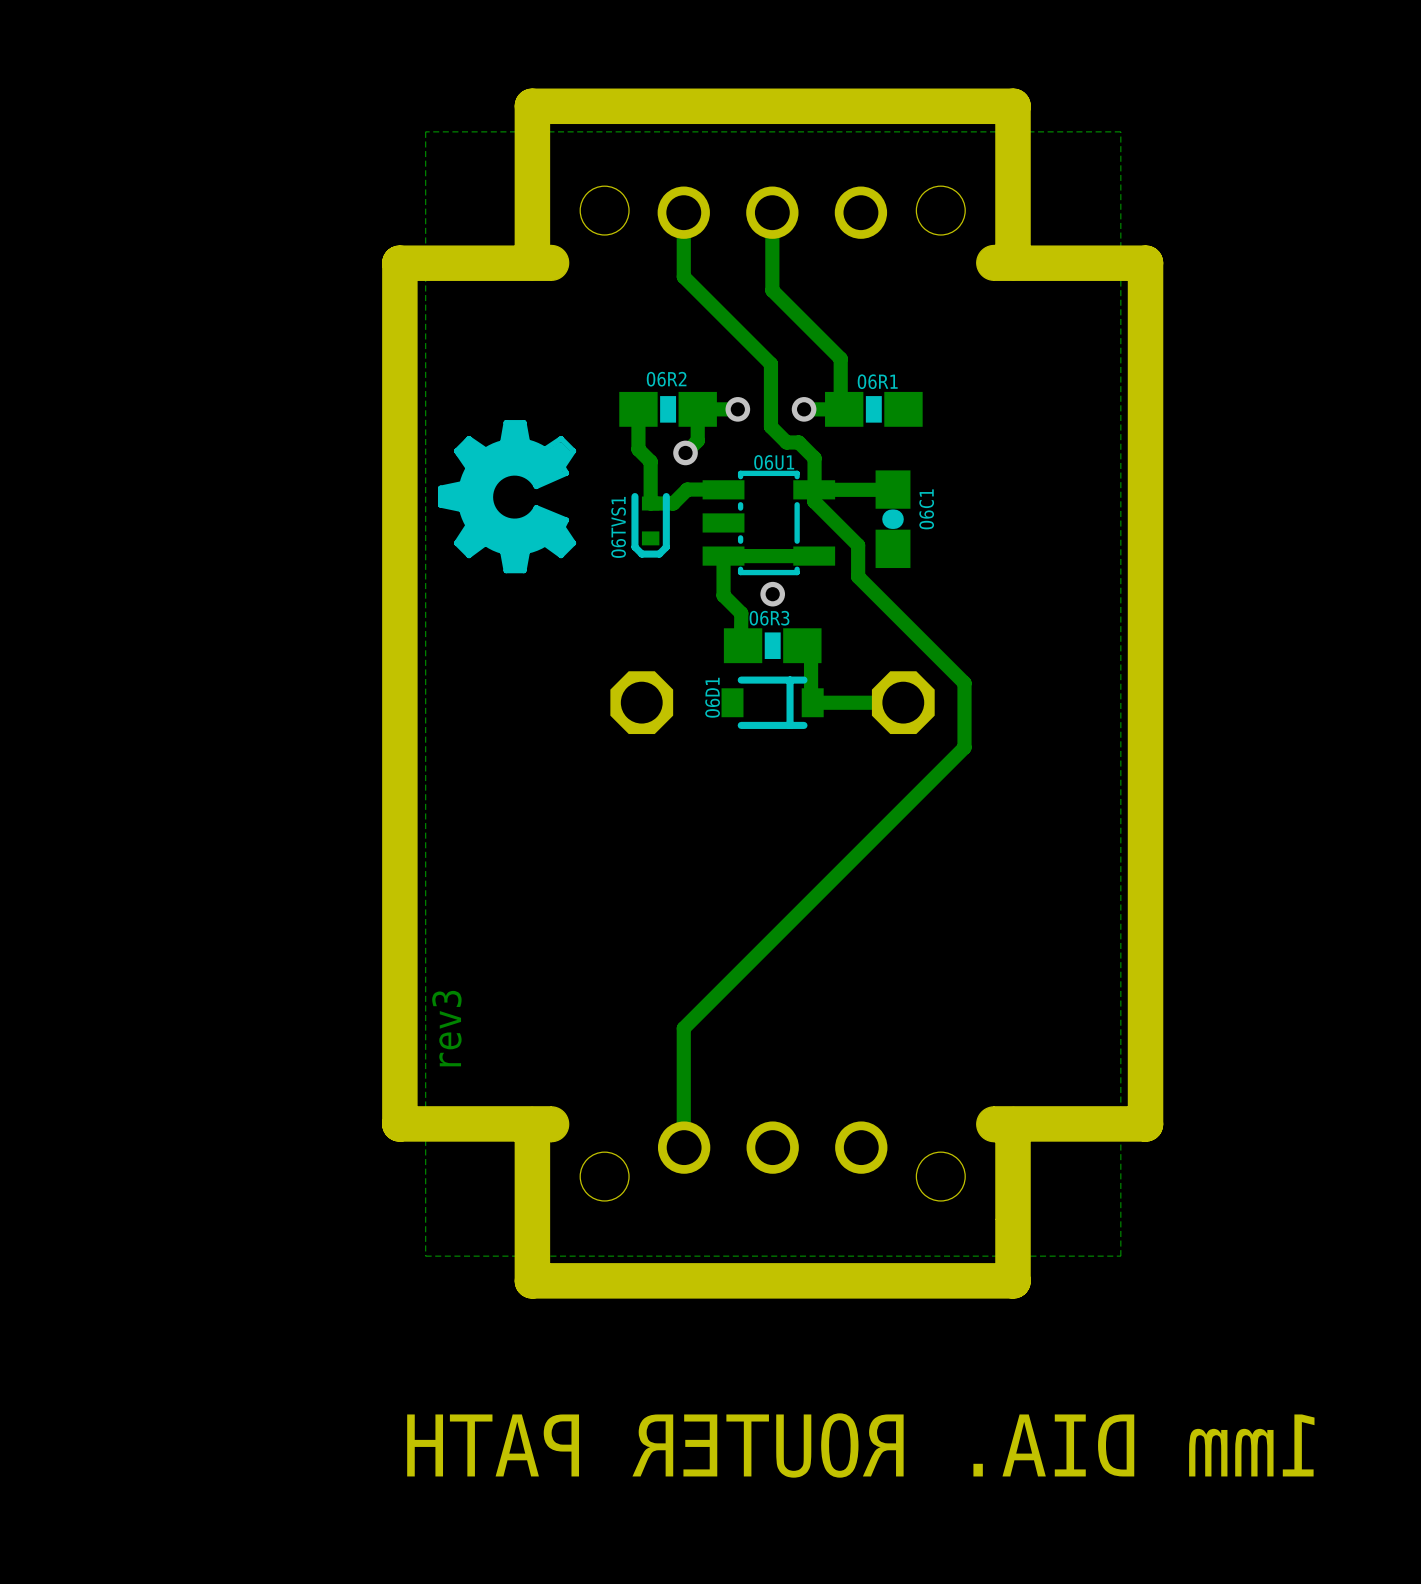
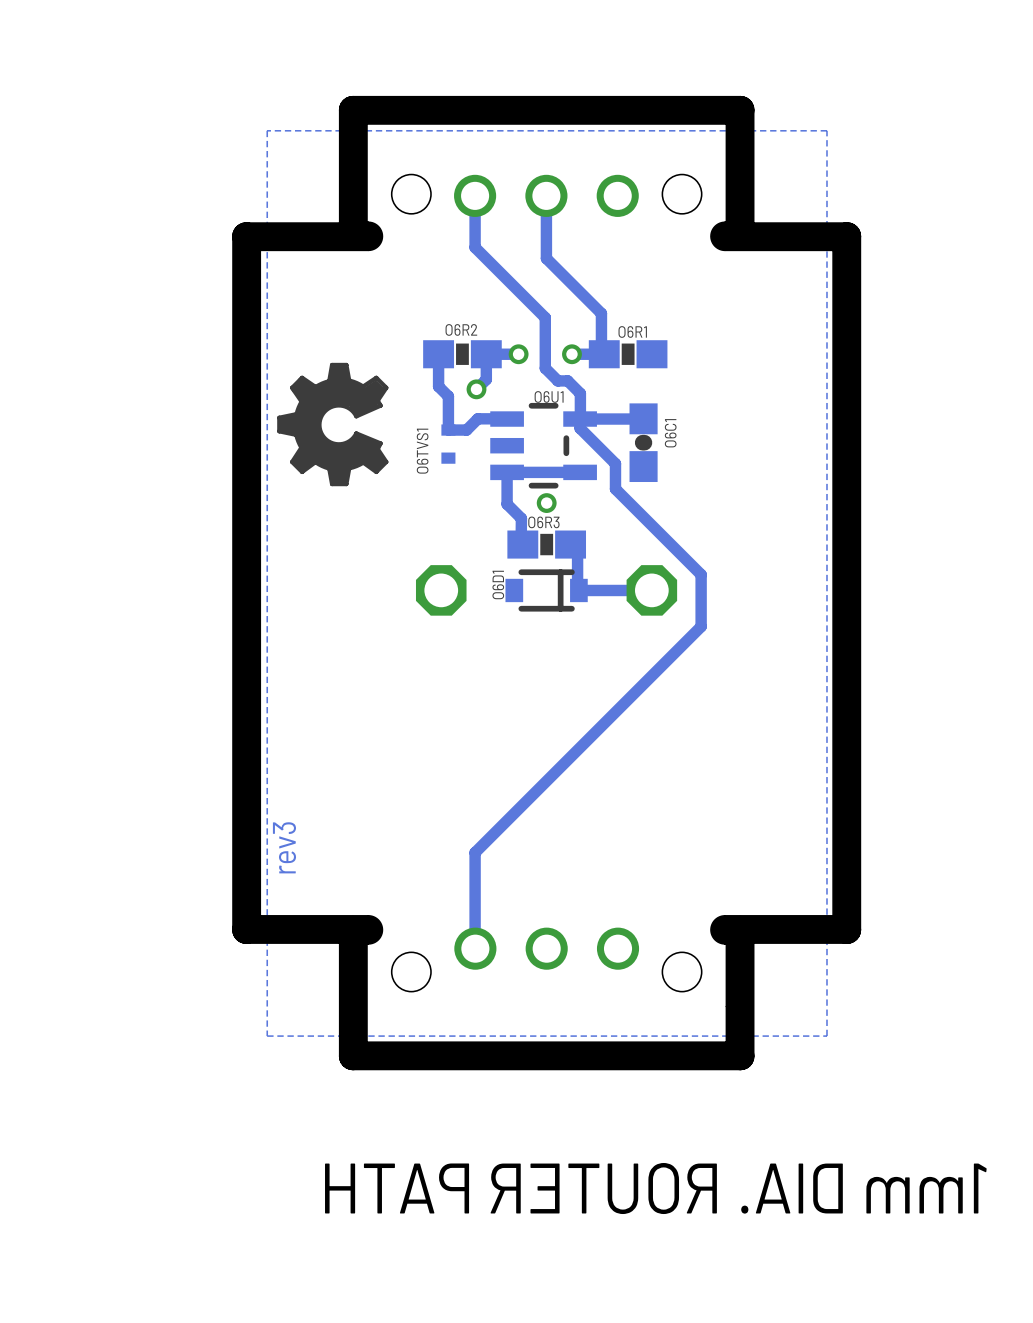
O6U1 footprint: [702, 470, 836, 576] -> [490, 402, 597, 489]
O6TVS1 footprint: [631, 493, 670, 558] -> [441, 424, 456, 464]

